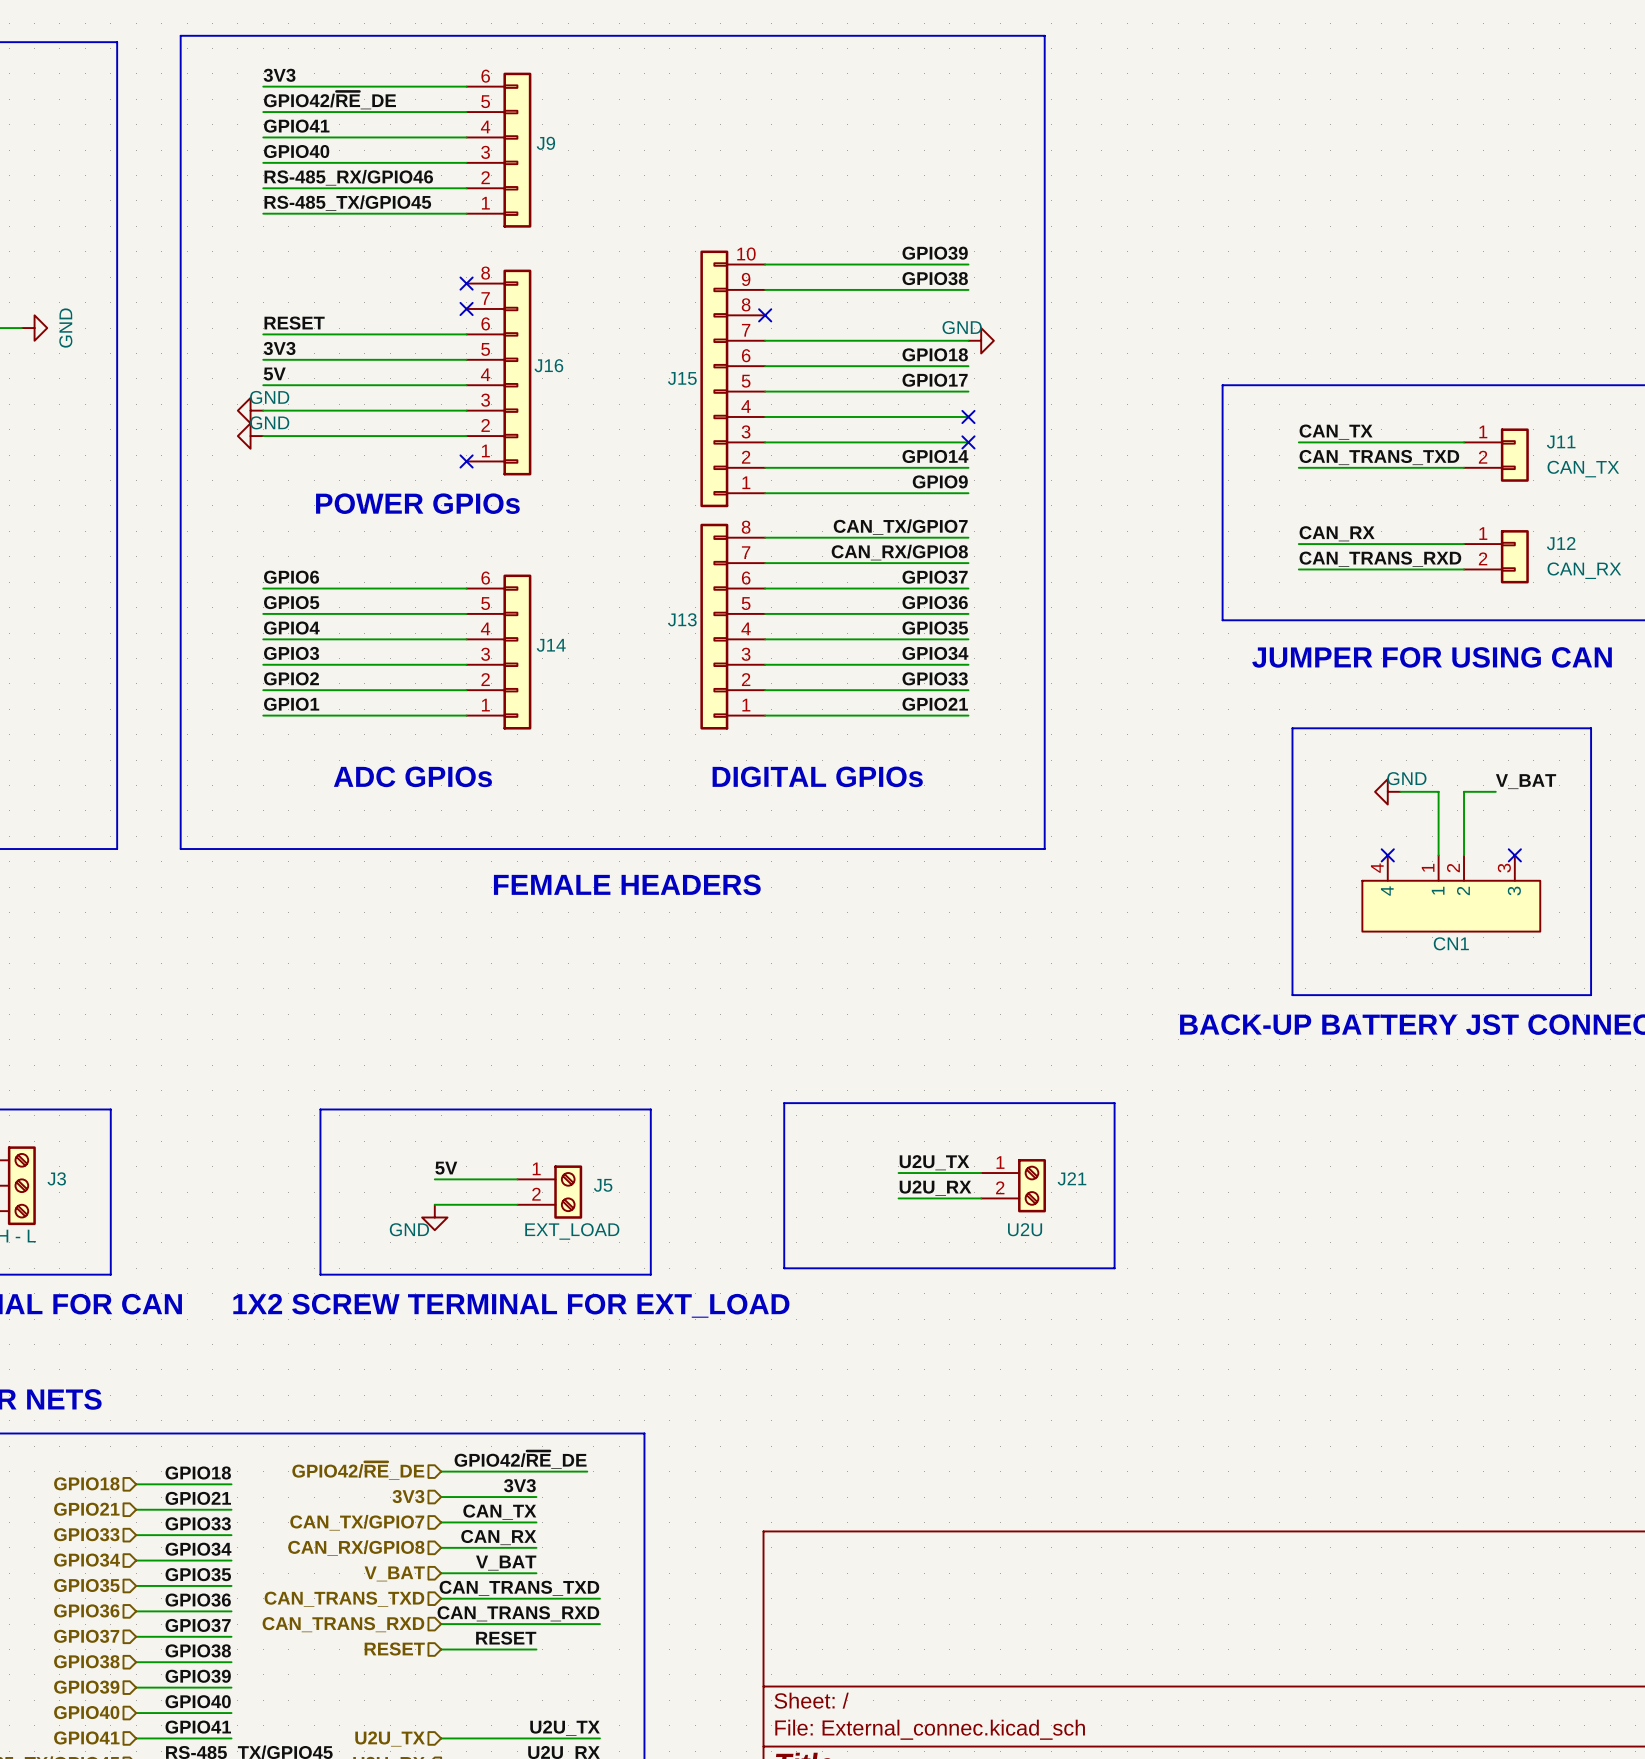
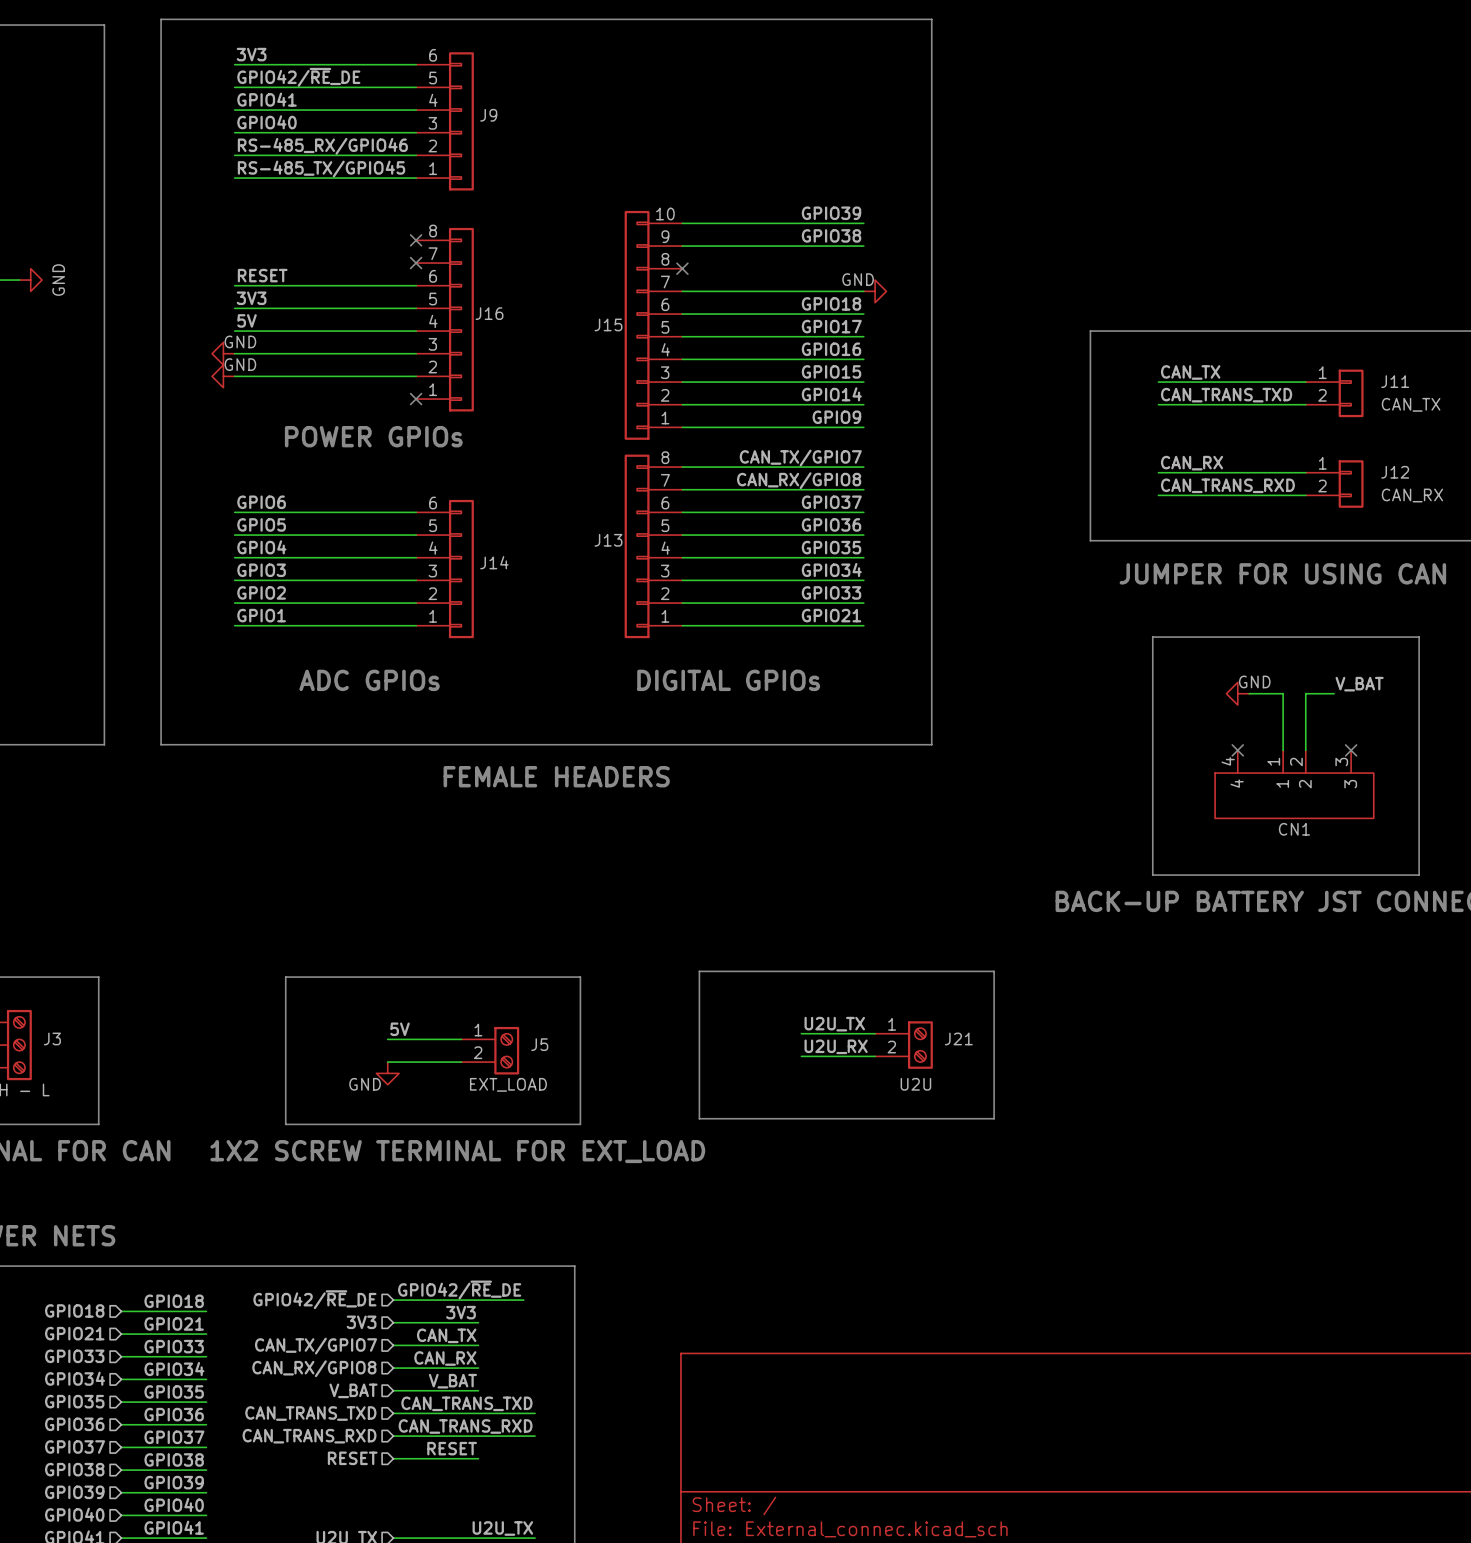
label: none -> GPIO16 (831, 349)
no-connect mark: (968, 416) -> none
label: none -> GPIO15 (831, 371)
no-connect mark: (968, 442) -> none

